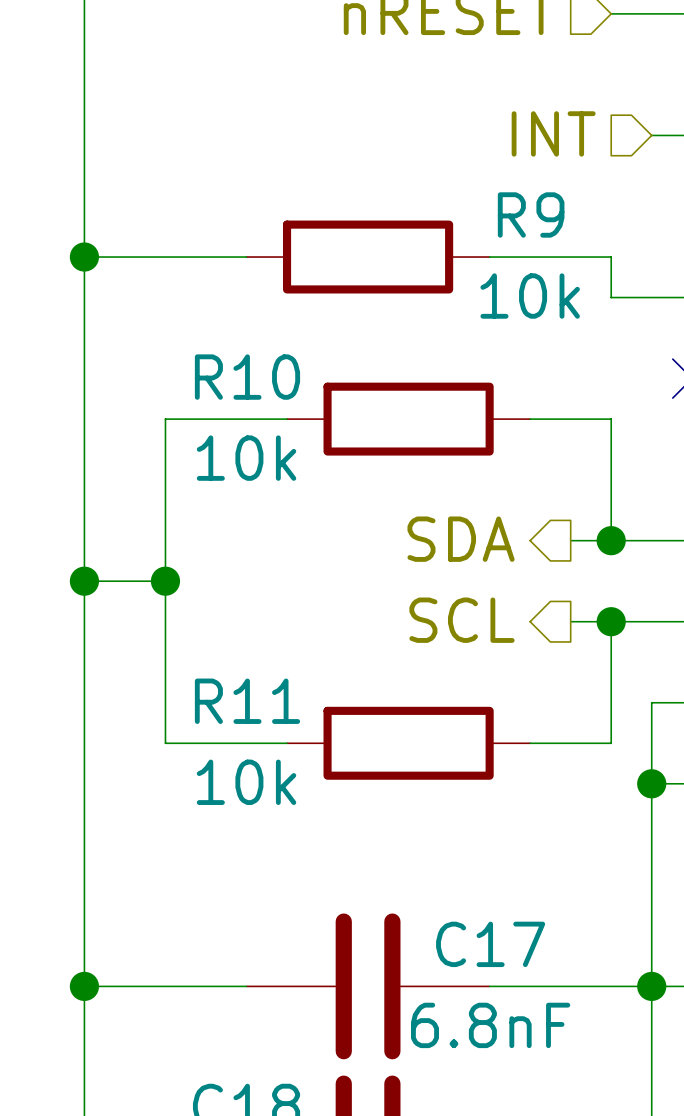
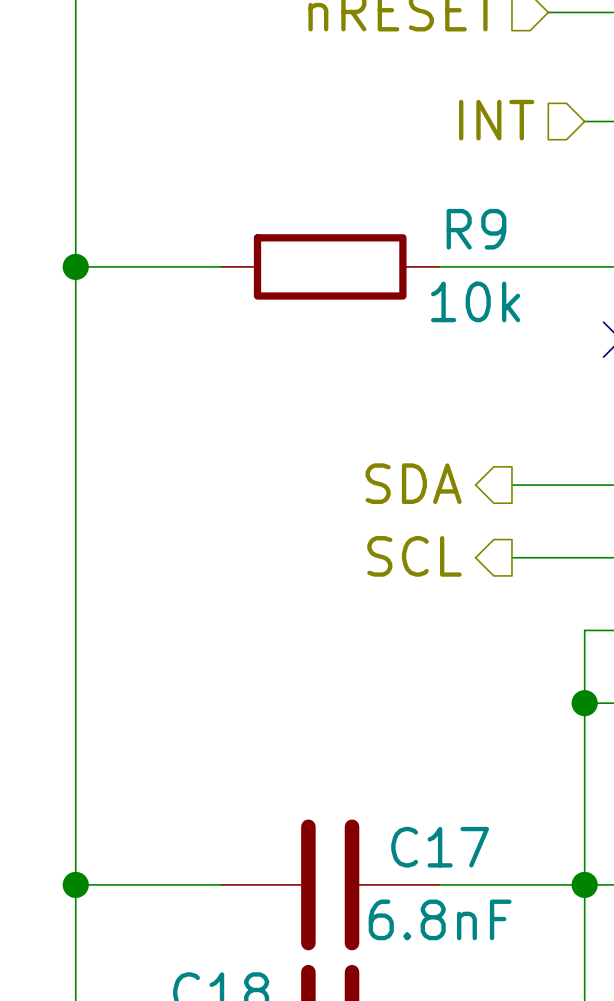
wire: (84, 257) (246, 257) -> (75, 266) (221, 266)
junction position: (84, 257) -> (75, 266)
R9 position: (368, 257) -> (330, 266)
wire: (489, 257) (611, 257) (611, 297) -> (439, 266) (548, 266)
wire: (287, 419) (165, 419) (165, 743) (287, 743) -> none
R10: 10k (408, 419) -> none
wire: (530, 419) (611, 419) (611, 540) -> none
junction: (611, 540) -> none
wire: (84, 581) (165, 581) -> none
junction: (84, 581) -> none
junction: (165, 581) -> none
wire: (611, 621) (611, 743) (530, 743) -> none
junction: (611, 621) -> none
R11: 10k (408, 743) -> none

